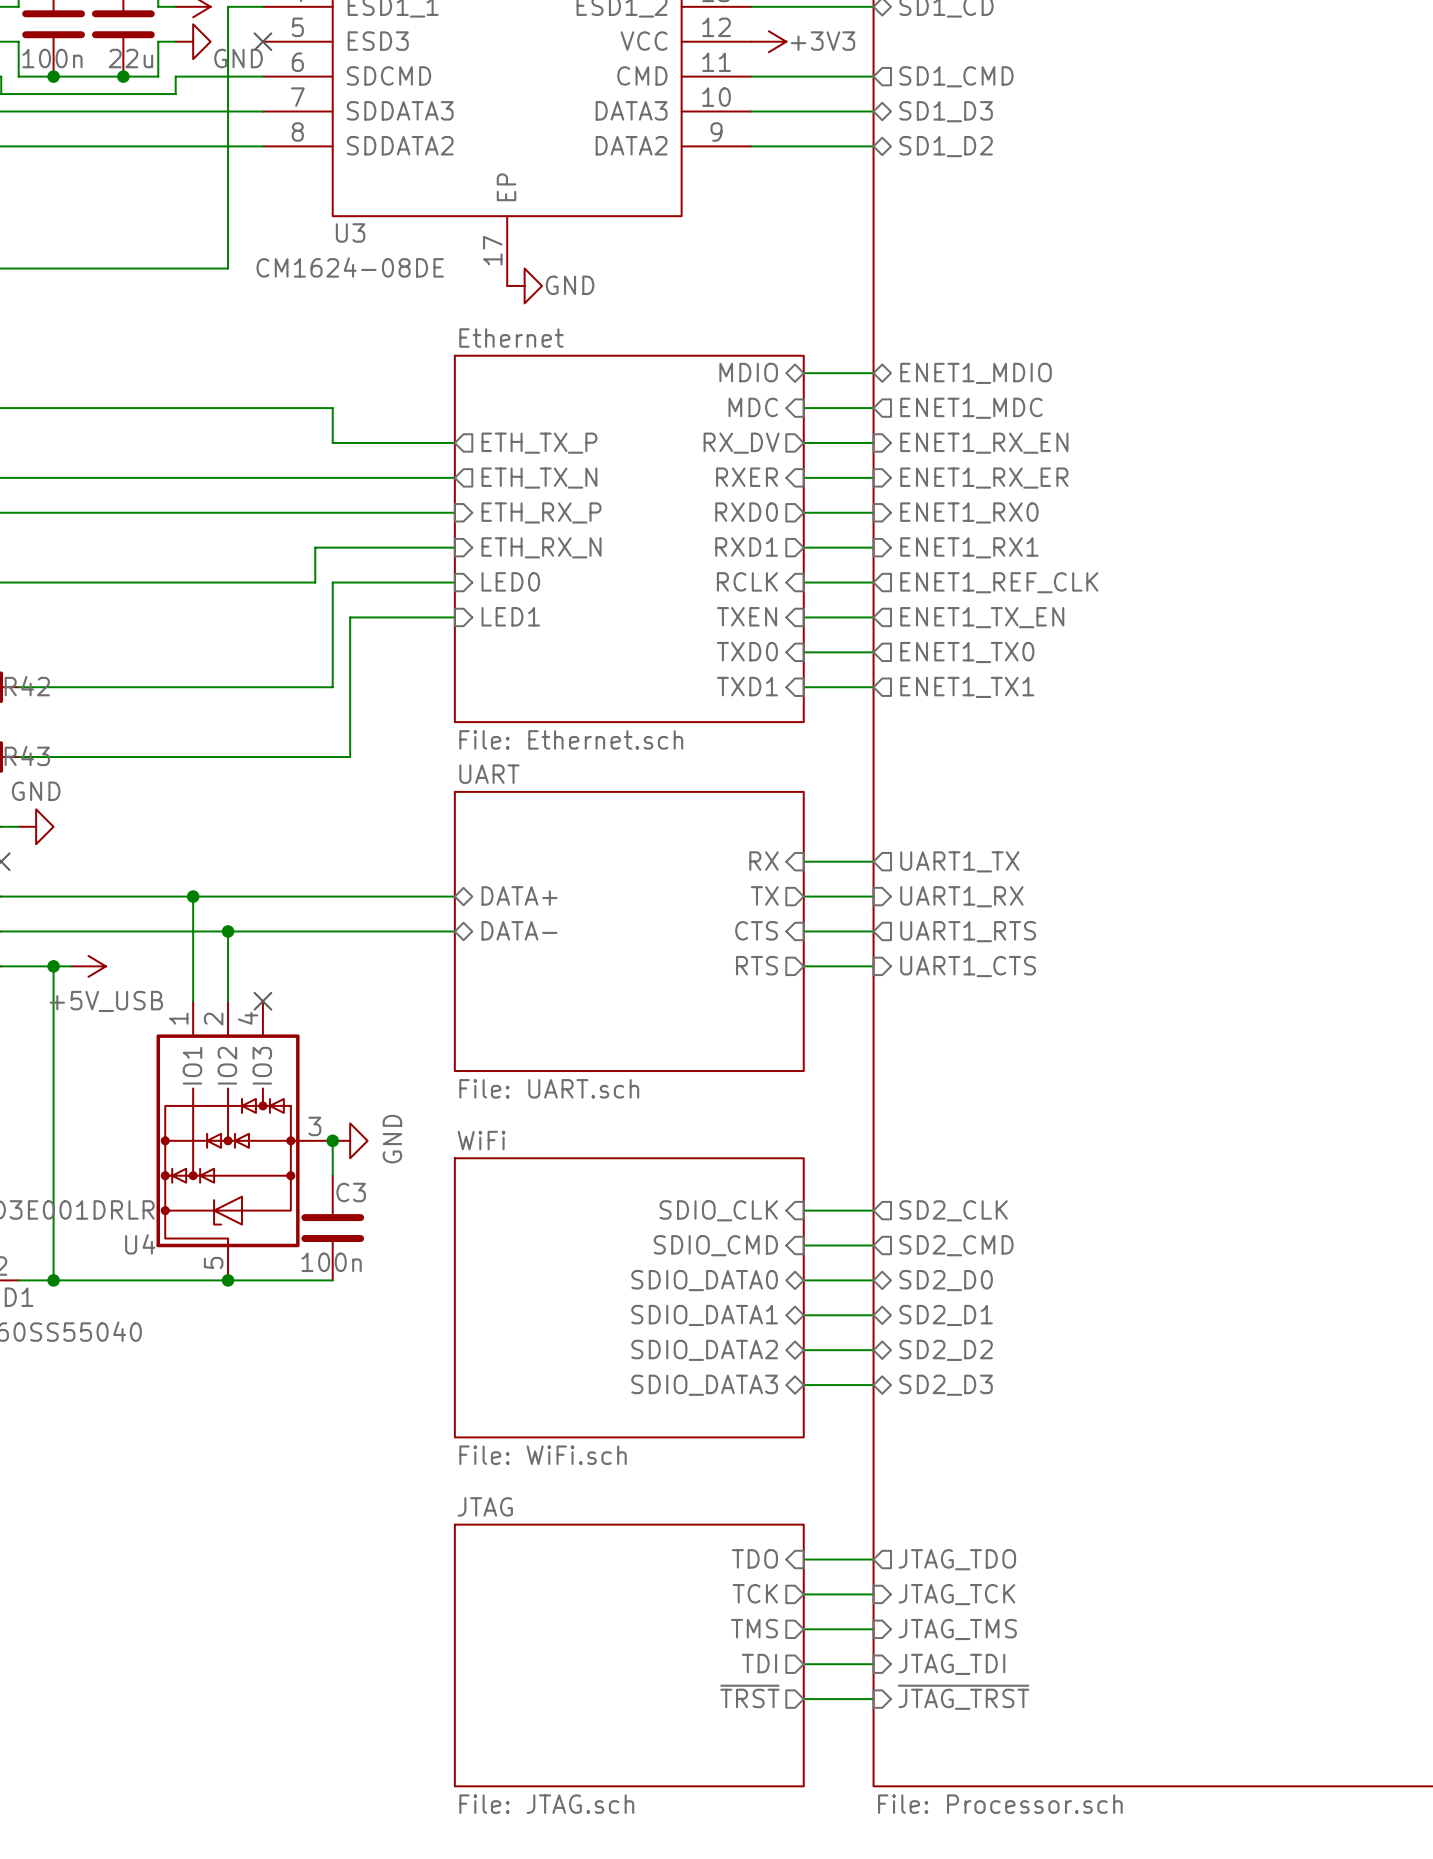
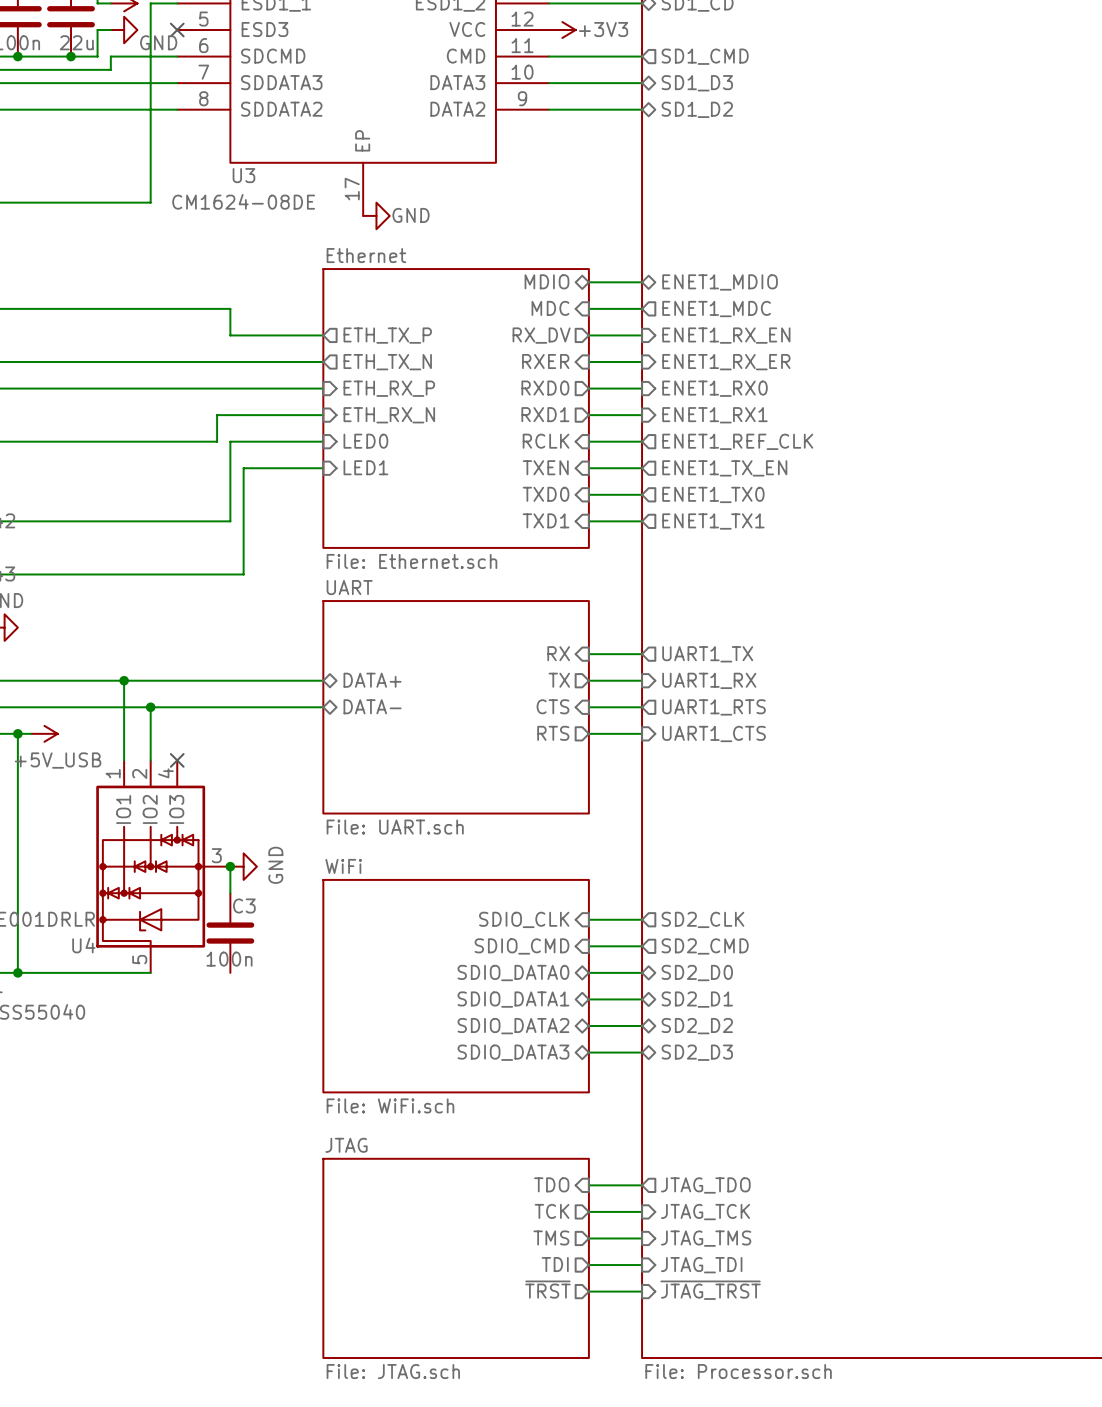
wire: (228, 1280) (332, 1280) -> none
junction: (228, 1280) -> none

